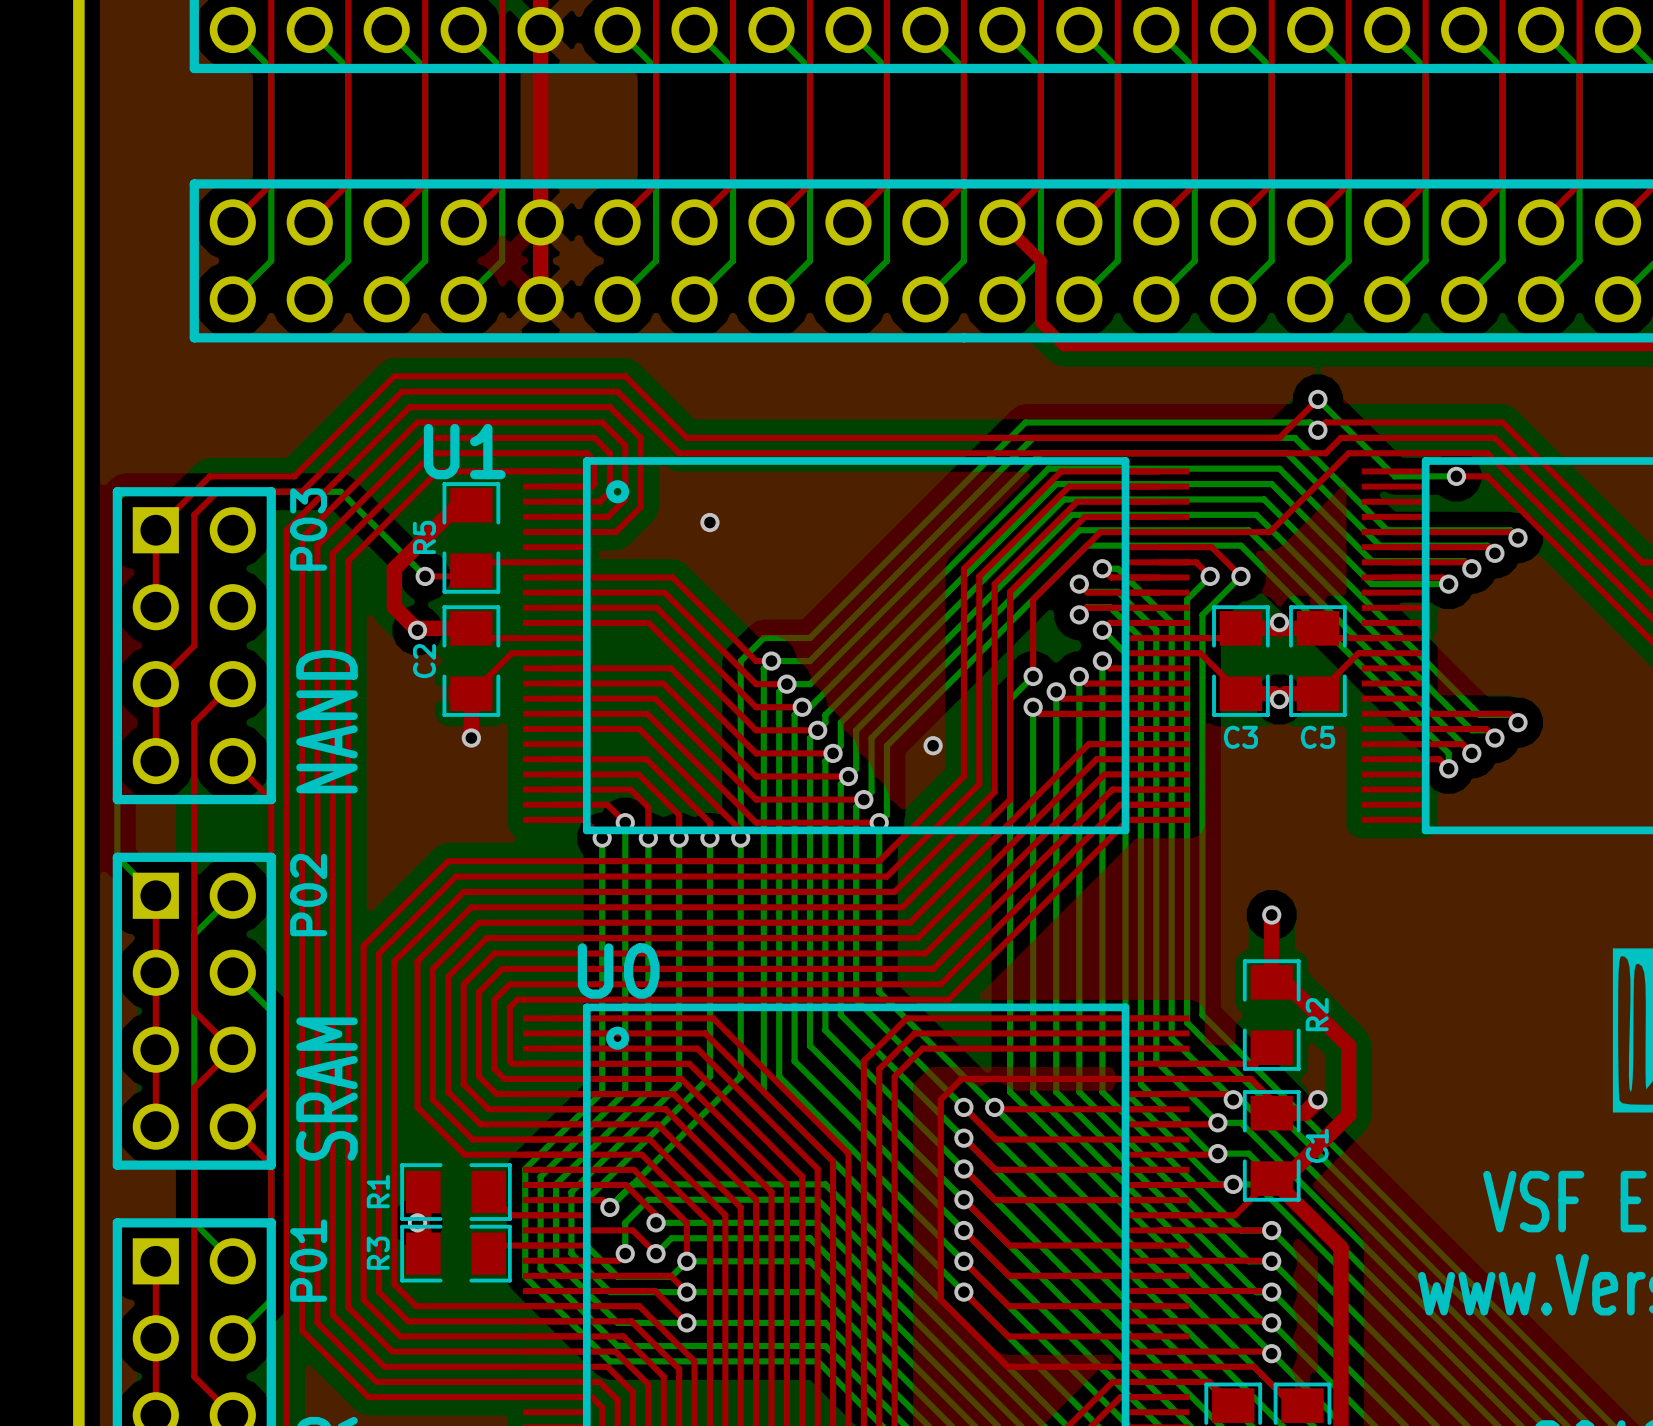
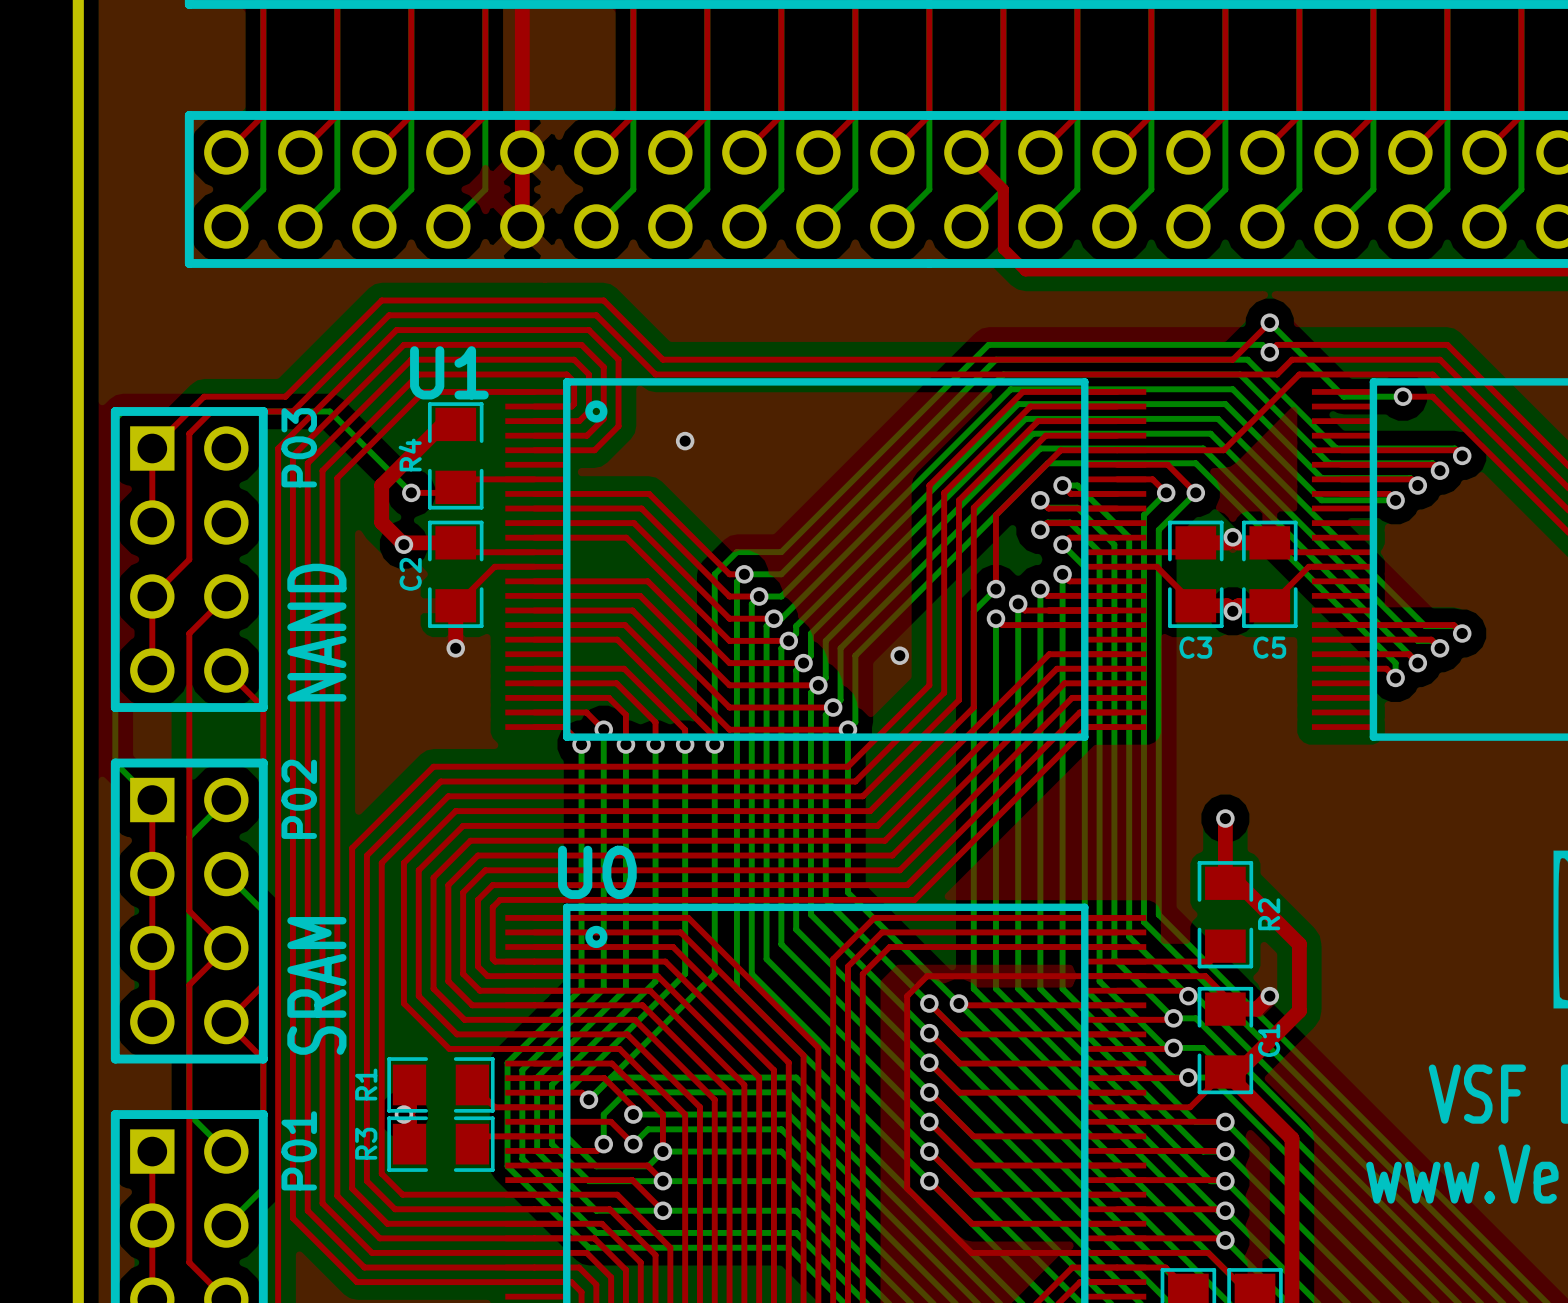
R5 name: R5 (424, 537) -> R4 (410, 455)

